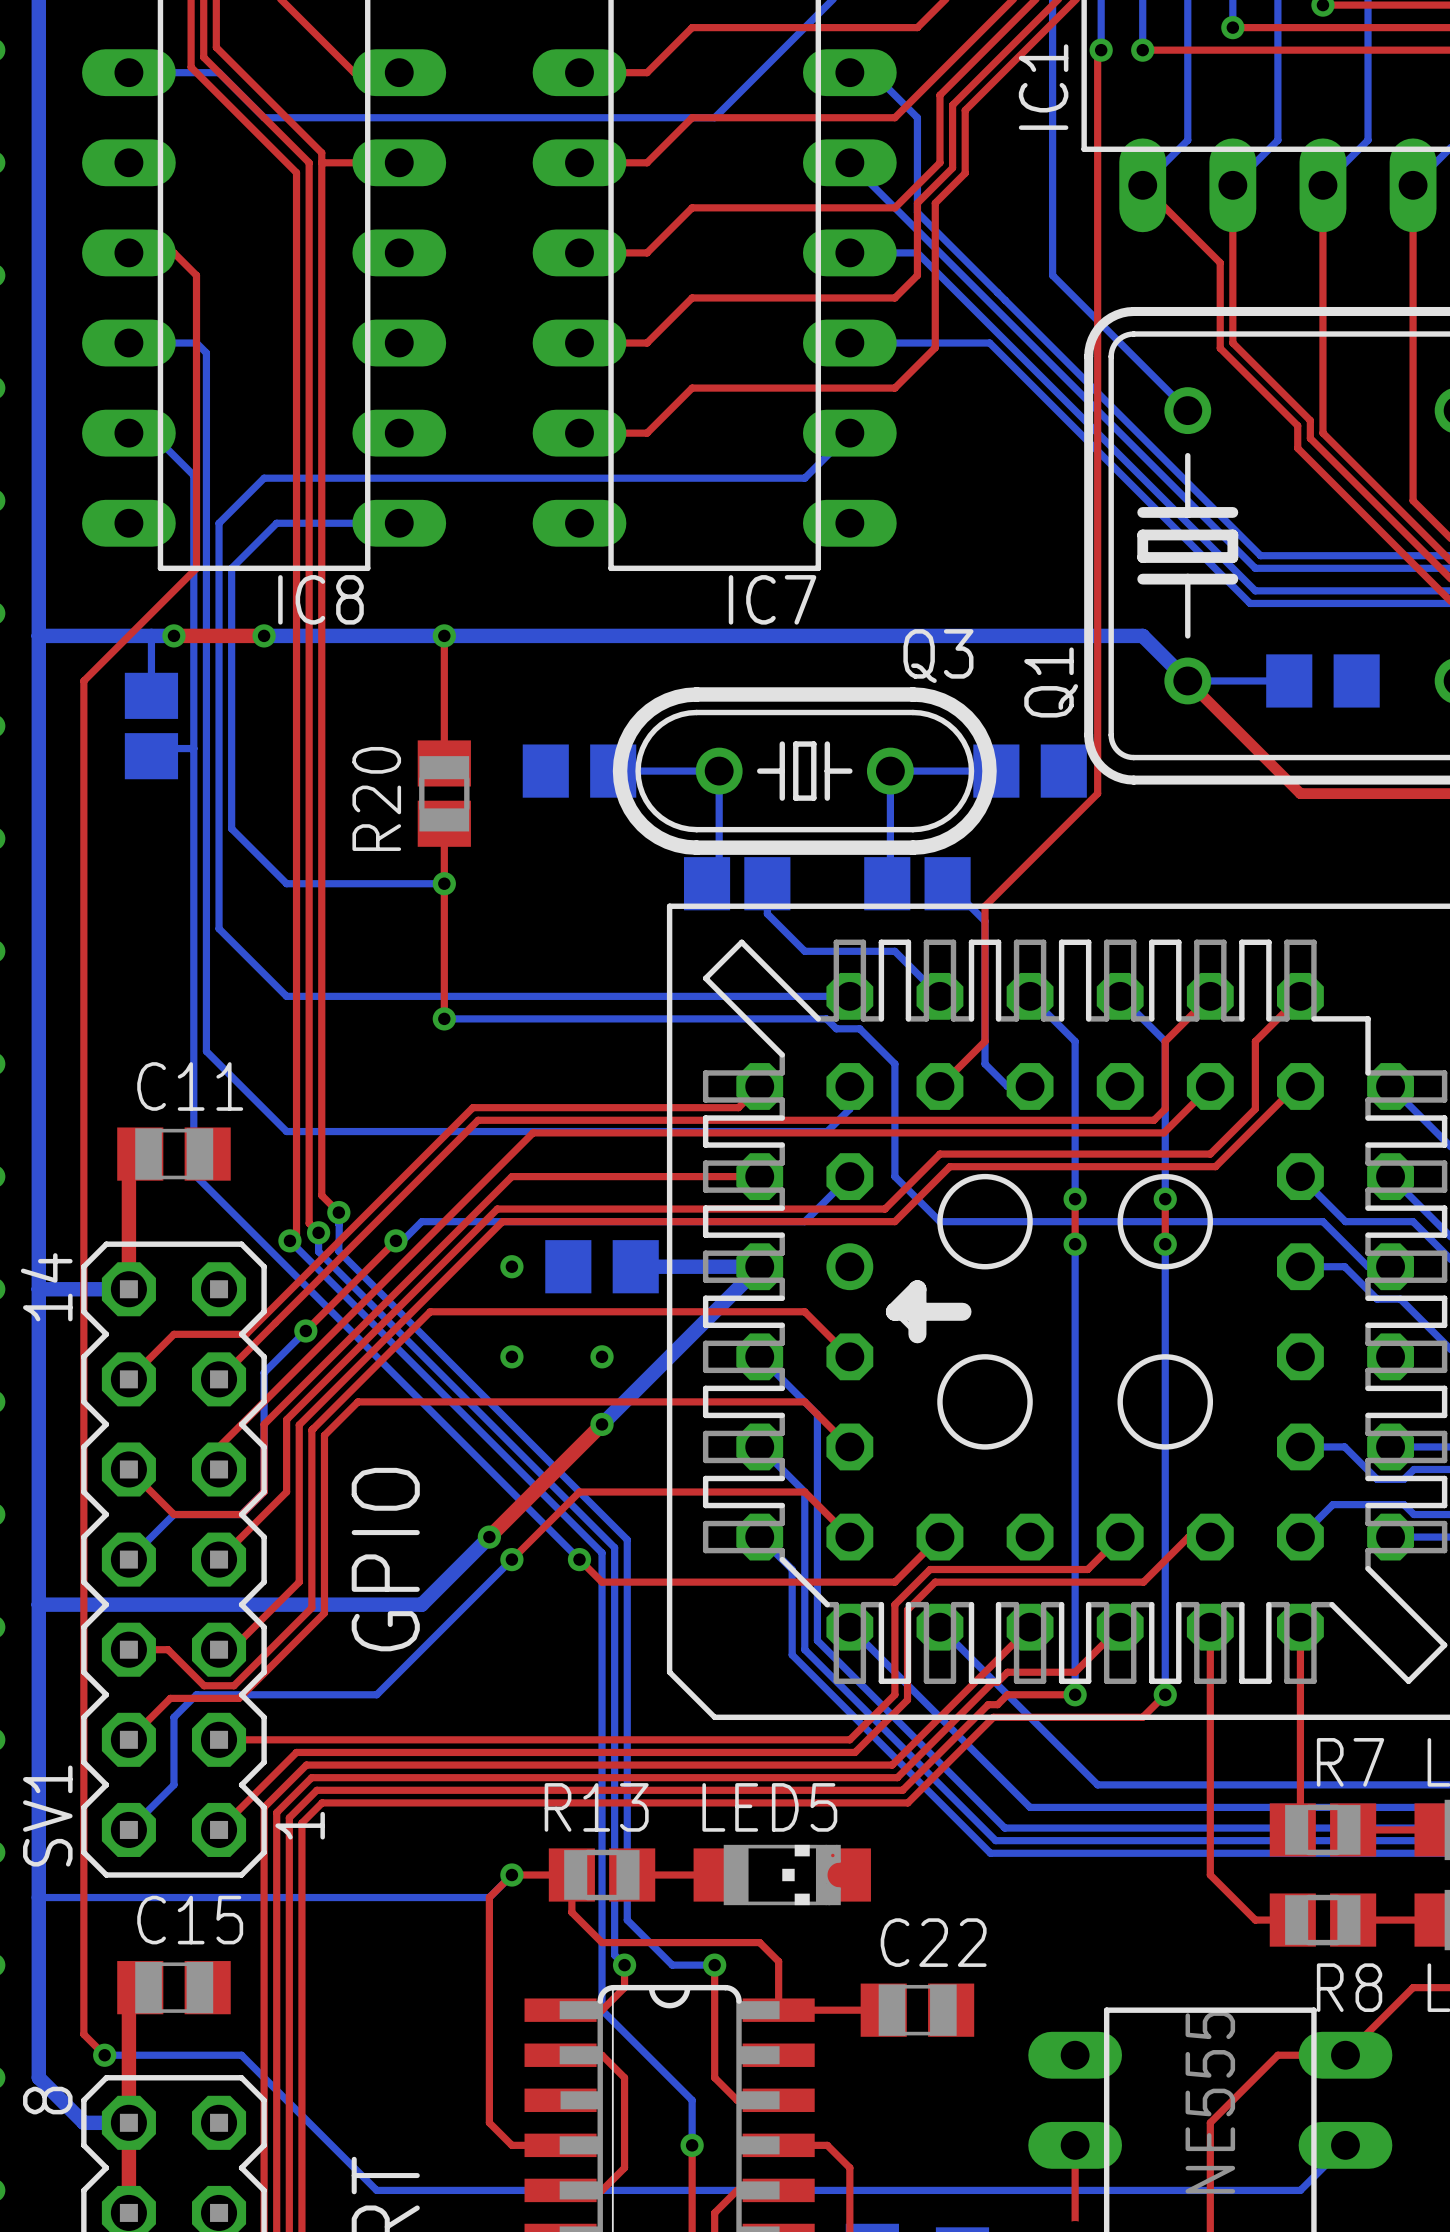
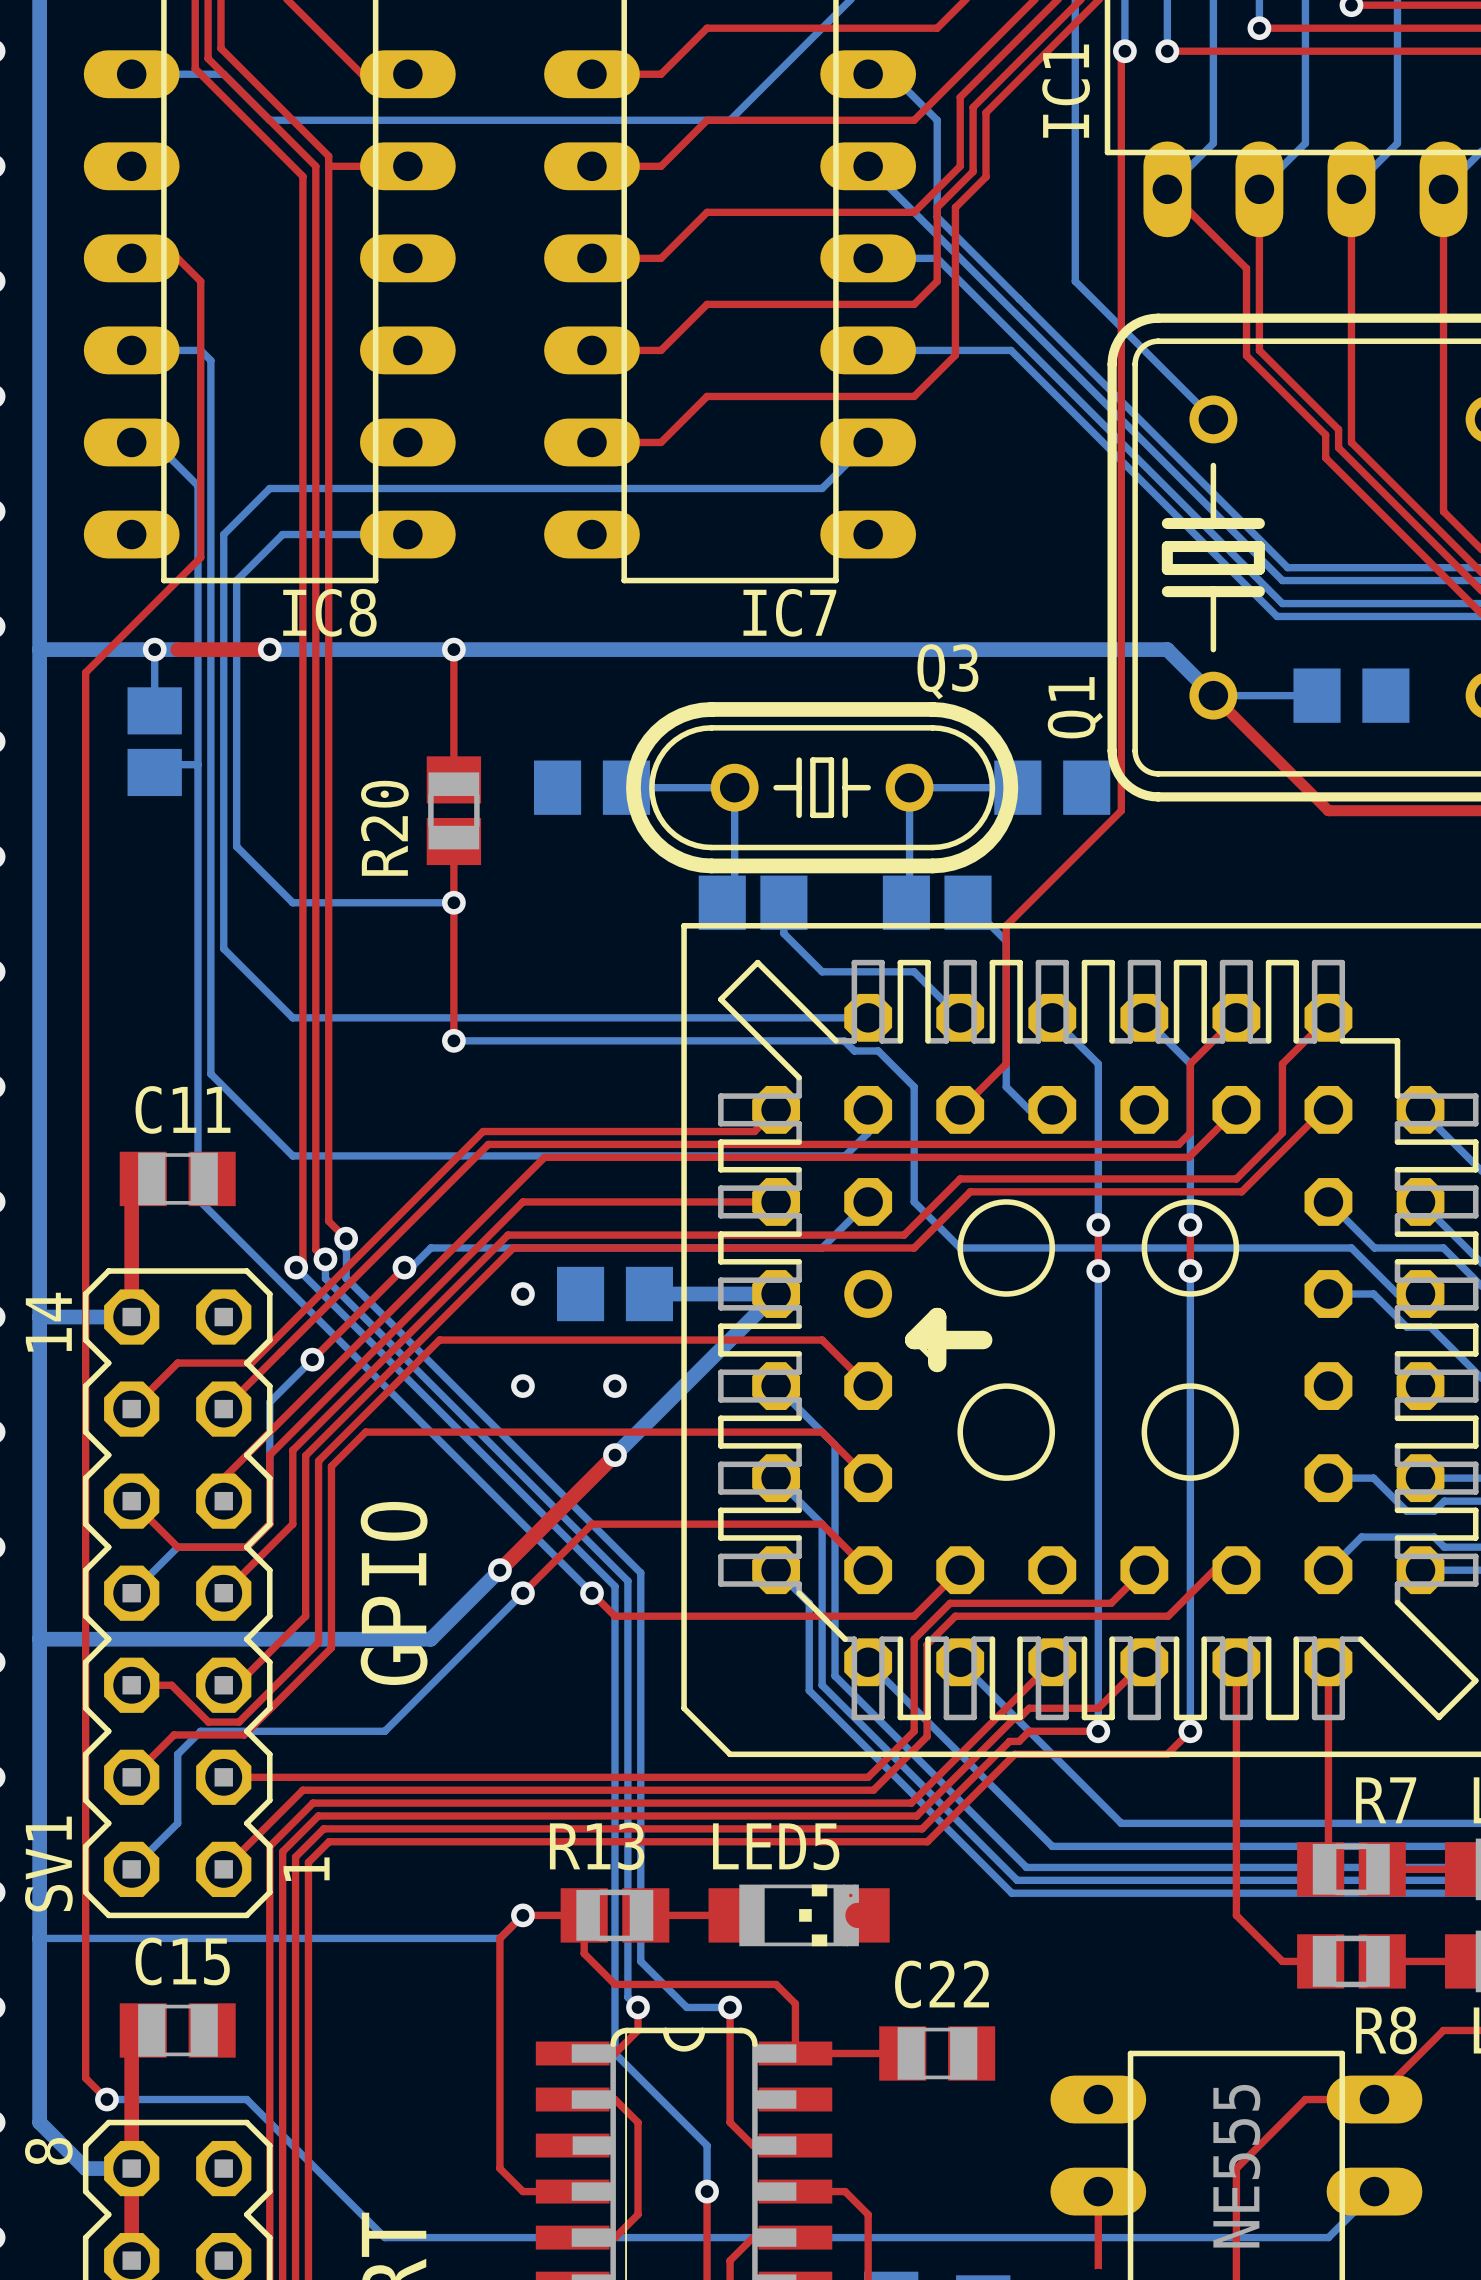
top track: (196, 545) (196, 568) (83, 680) -> (200, 557) (85, 672) (85, 695)
via position: (173, 635) -> (154, 649)

